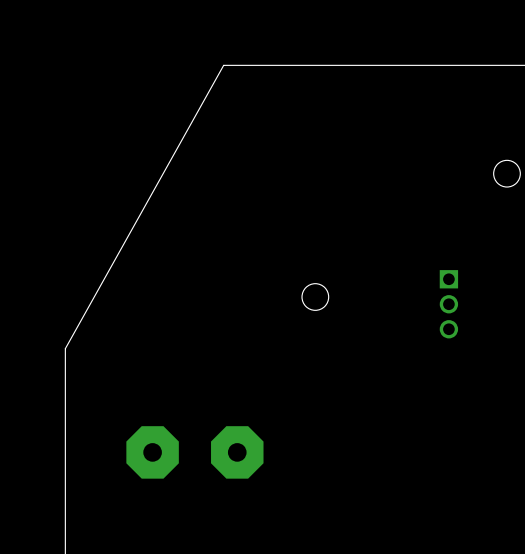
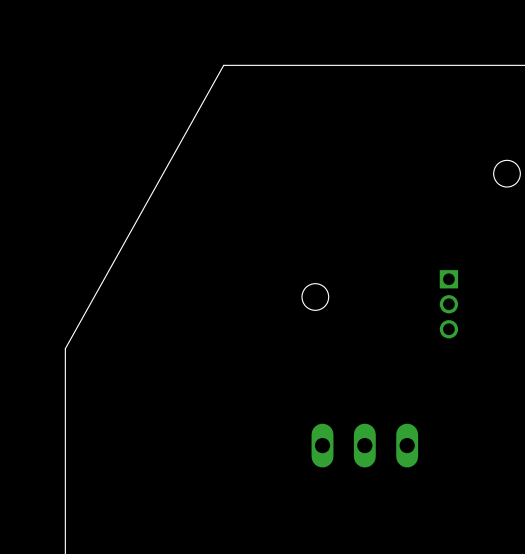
part: none -> (364, 445)
part: (194, 452) -> none

